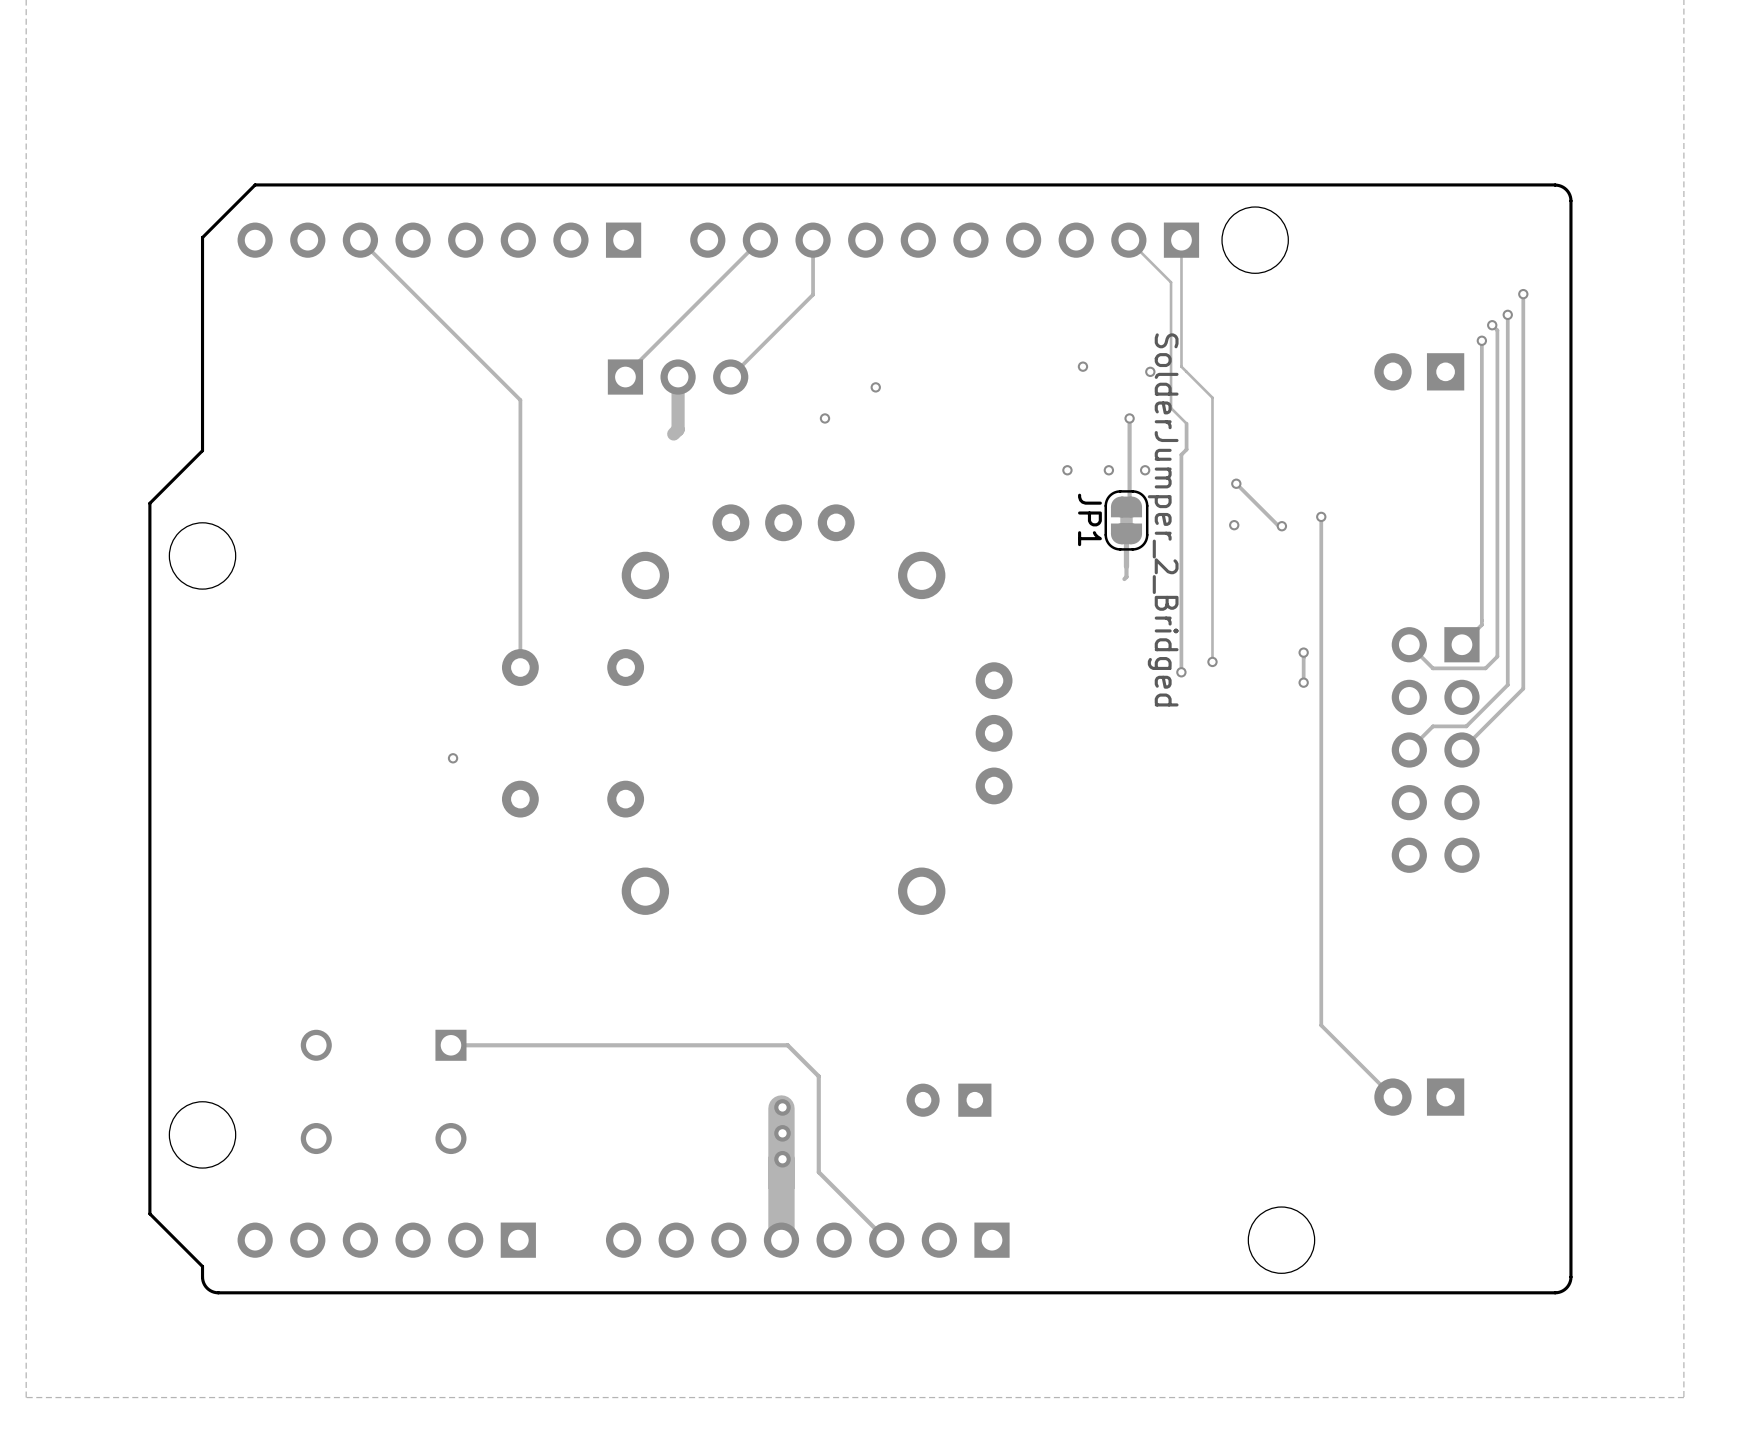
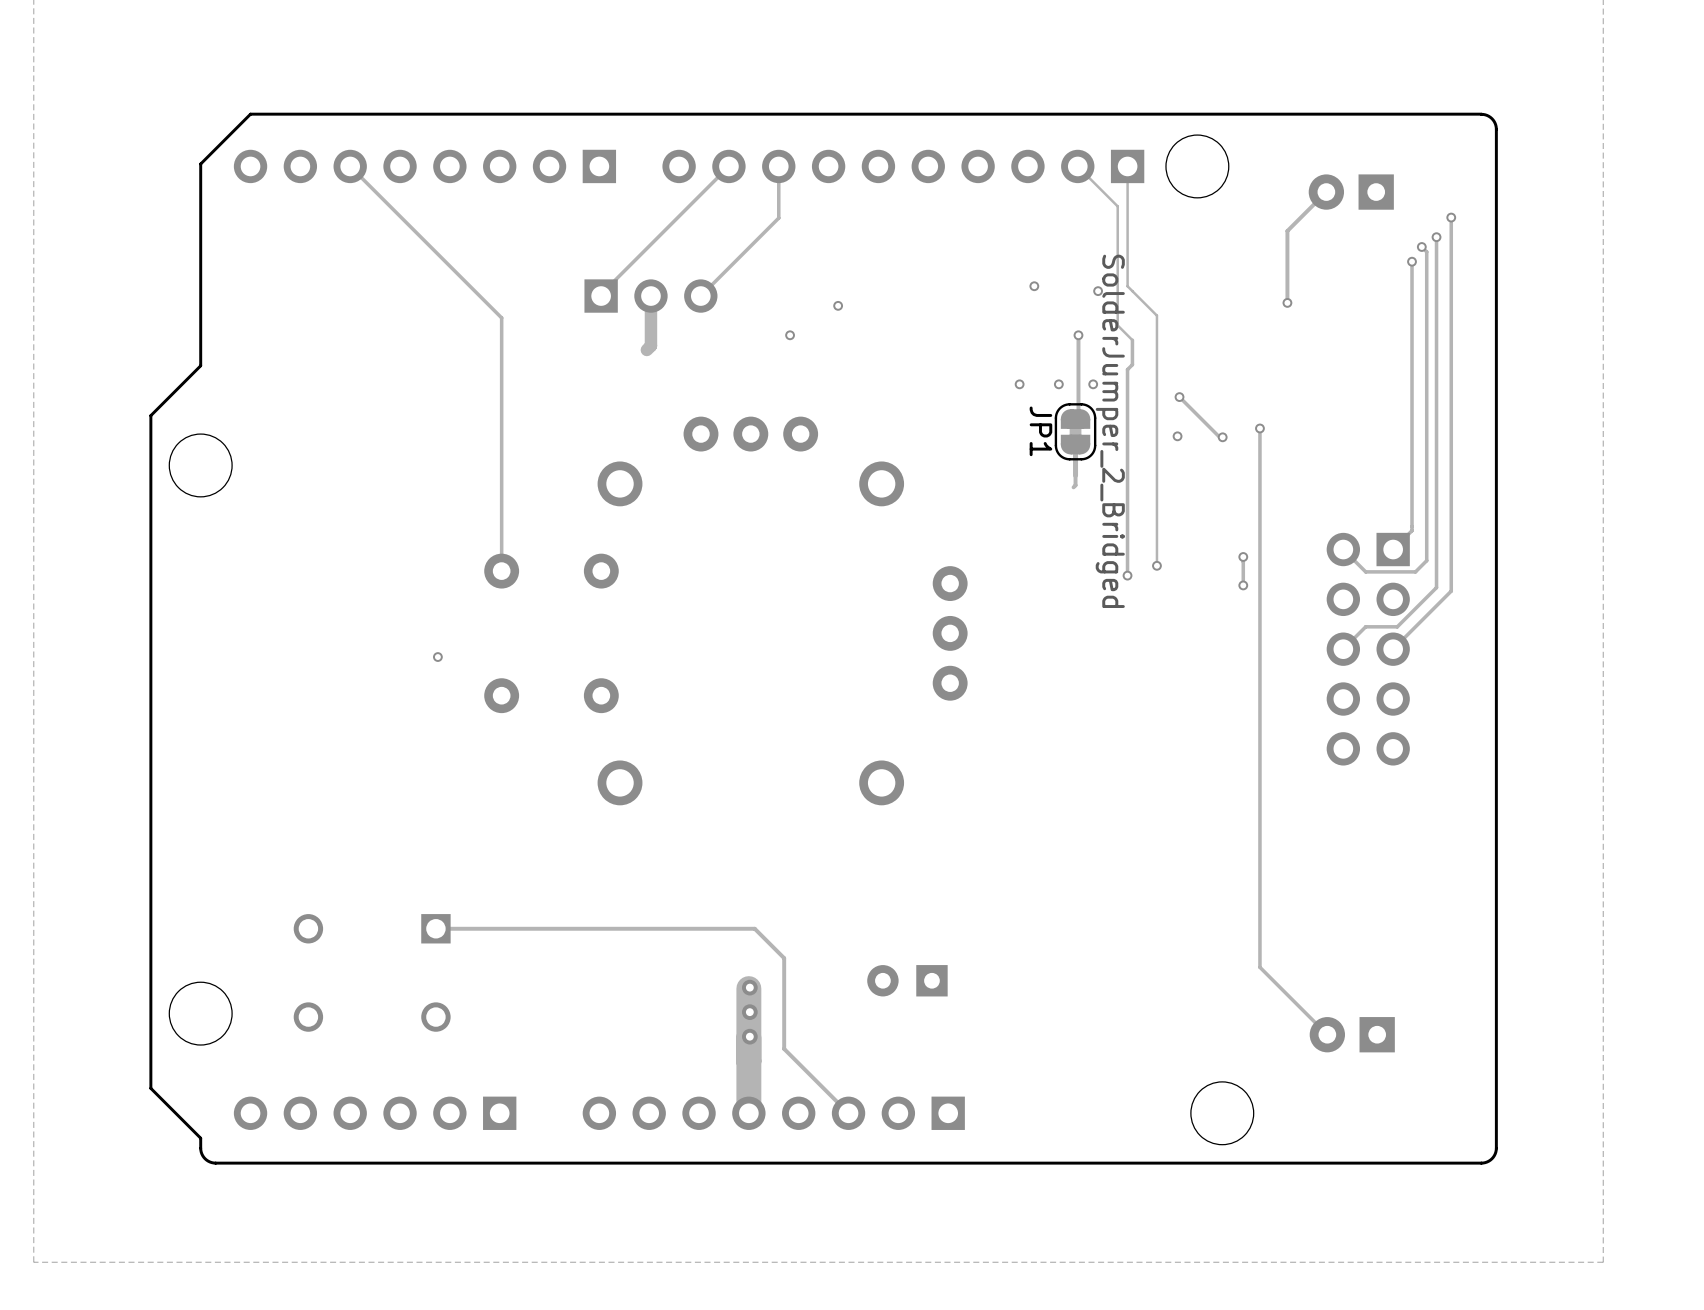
track: none -> (1326, 192) (1287, 231) (1287, 302)
part position: (1419, 371) -> (1351, 192)
via: none -> (1287, 302)
track: (1321, 1025) (1392, 1097) -> (1259, 909) (1259, 967) (1327, 1034)
part position: (1419, 1097) -> (1352, 1034)

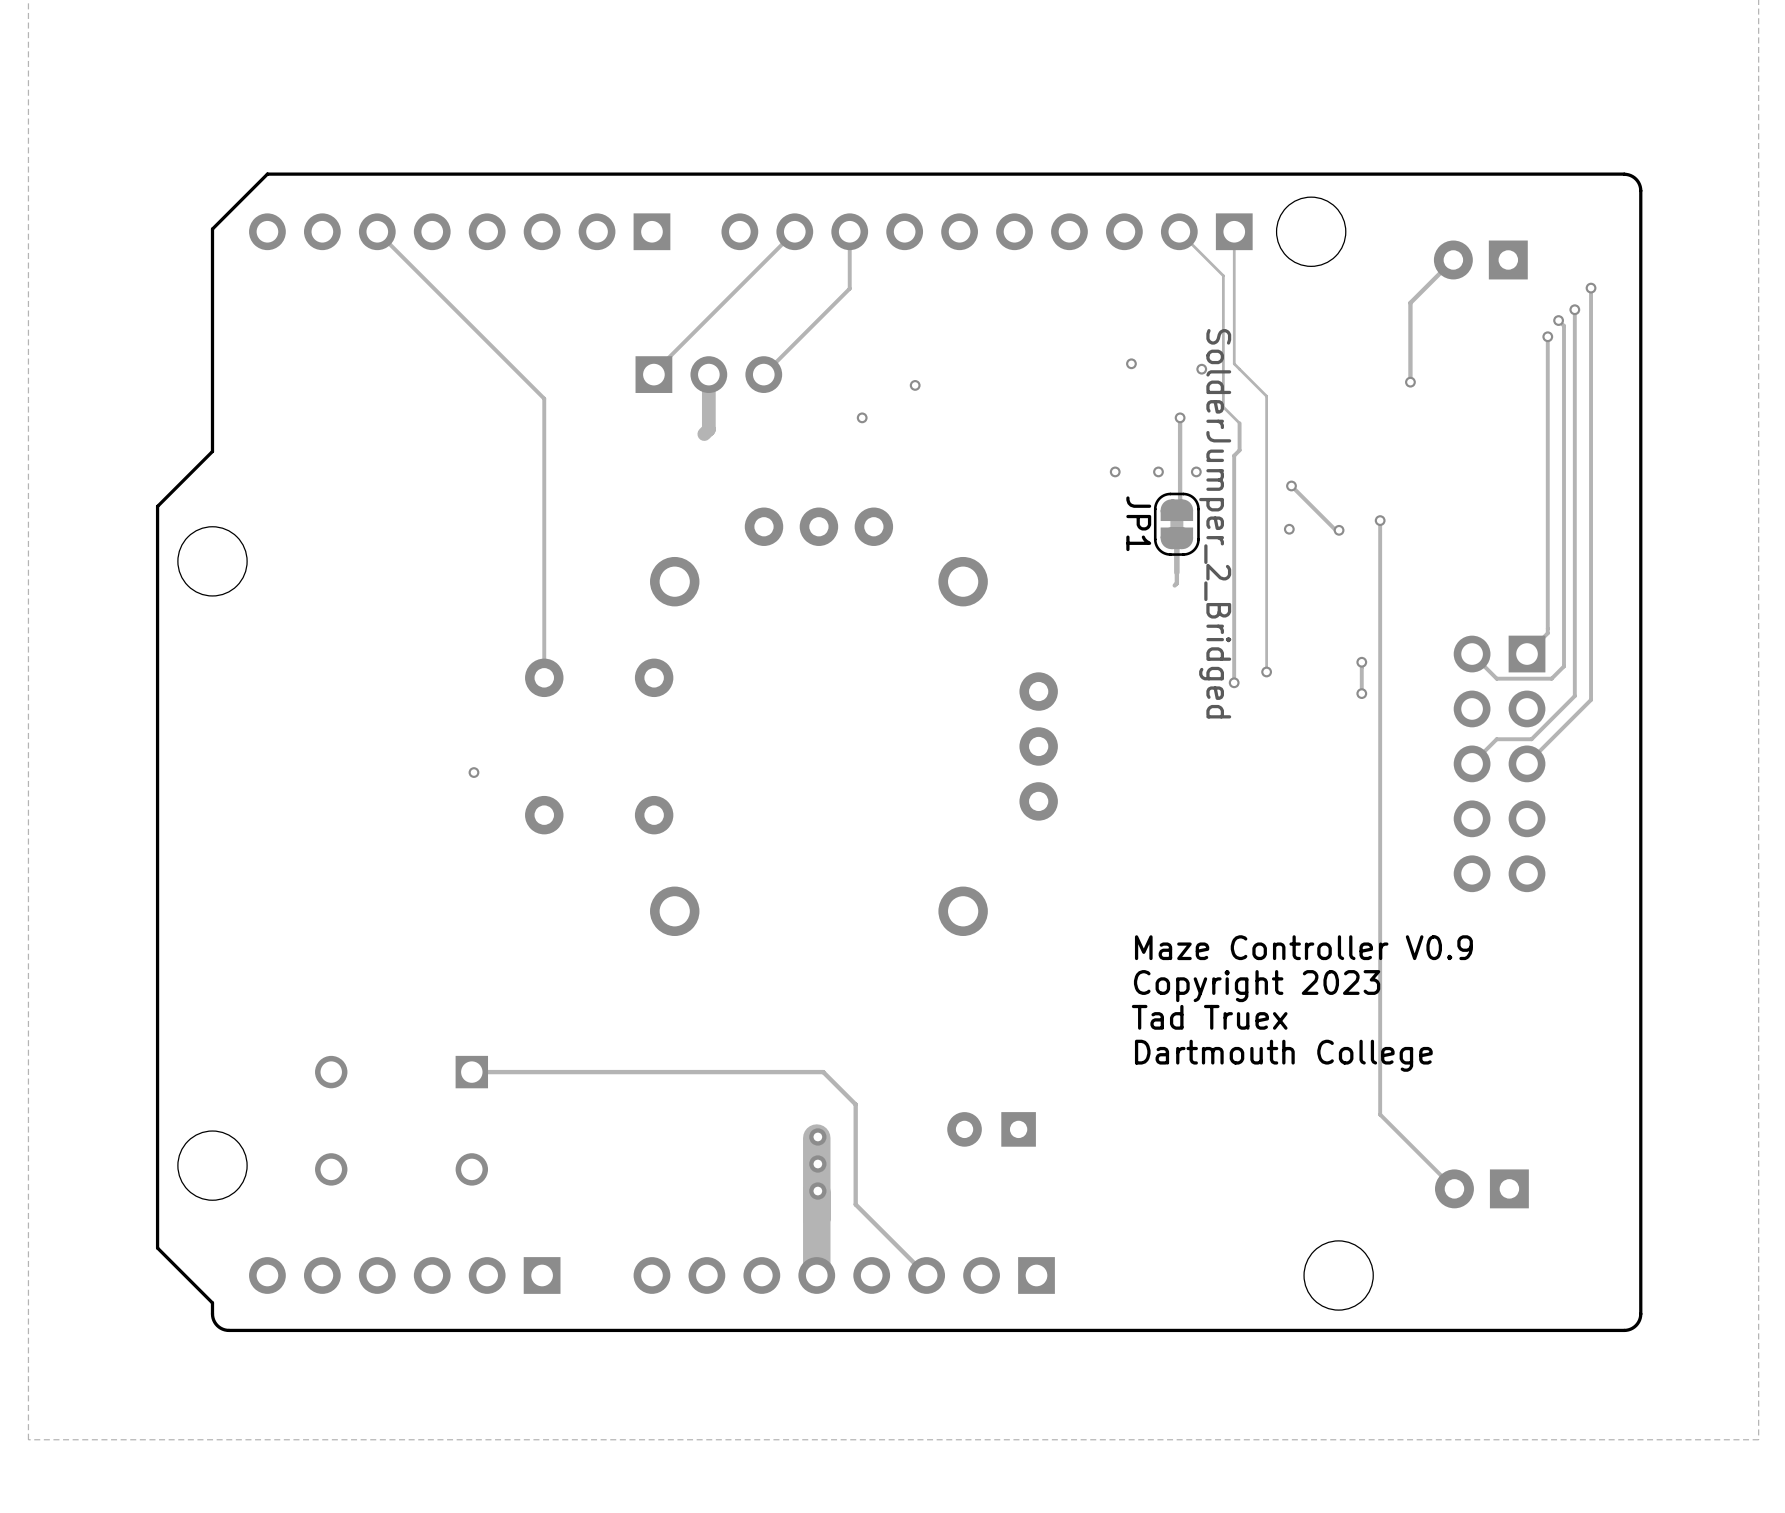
text: none -> Maze Controller V0.9 (1303, 947)
text: none -> Copyright 2023 (1257, 986)
text: none -> Tad Truex (1209, 1017)
text: none -> Dartmouth College (1283, 1055)

